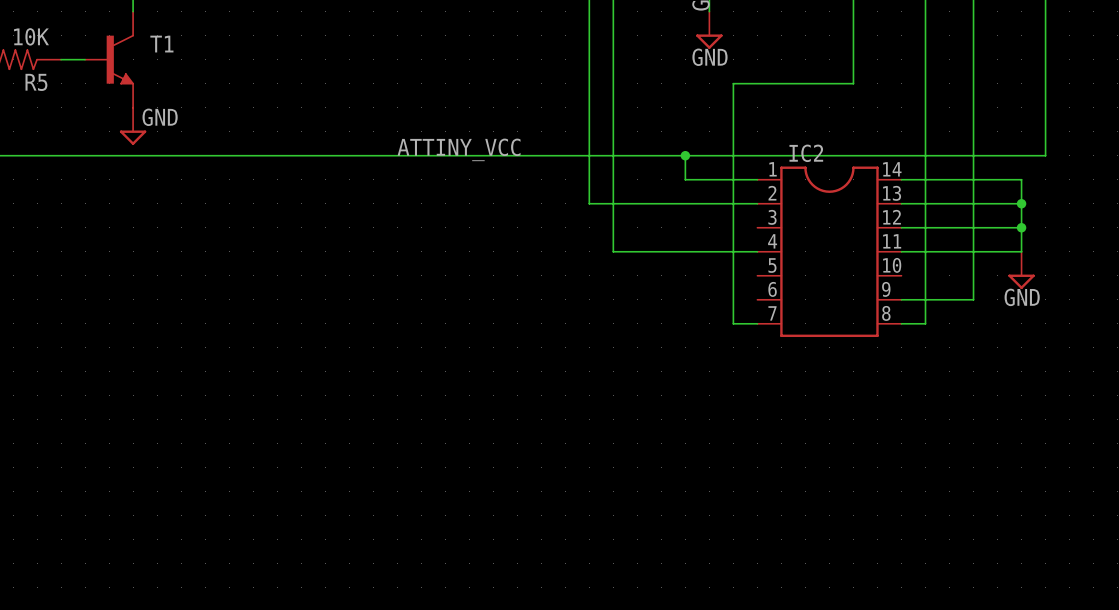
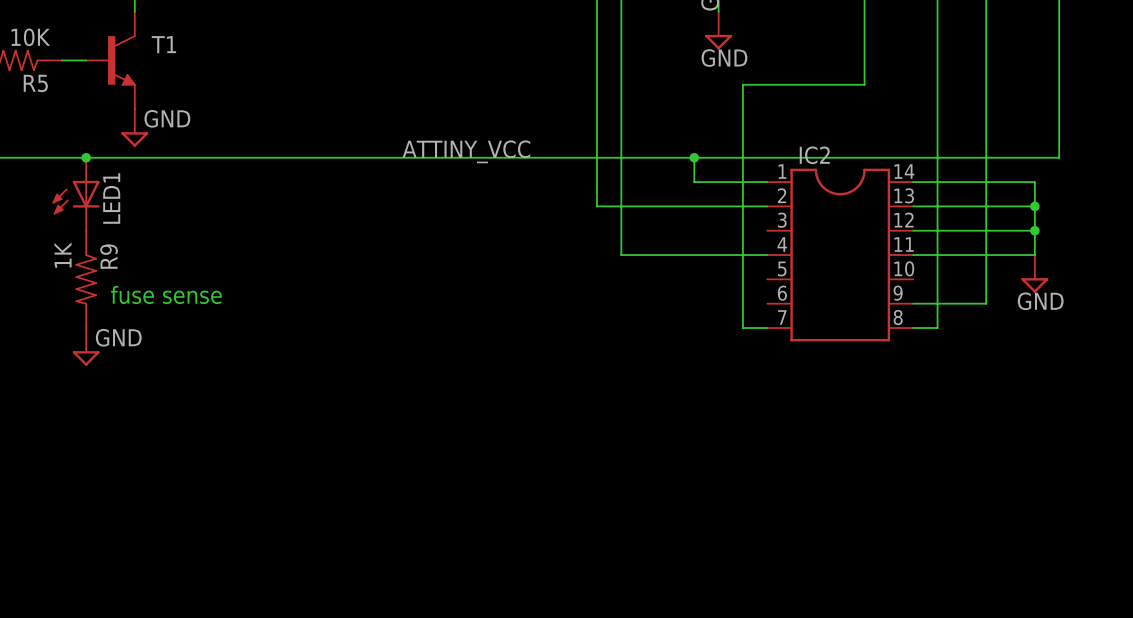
junction: none -> (86, 157)
LED1: none -> (76, 194)
R9: none -> 1K (86, 279)
text: none -> fuse sense (166, 294)
power symbol: none -> GND (86, 346)

